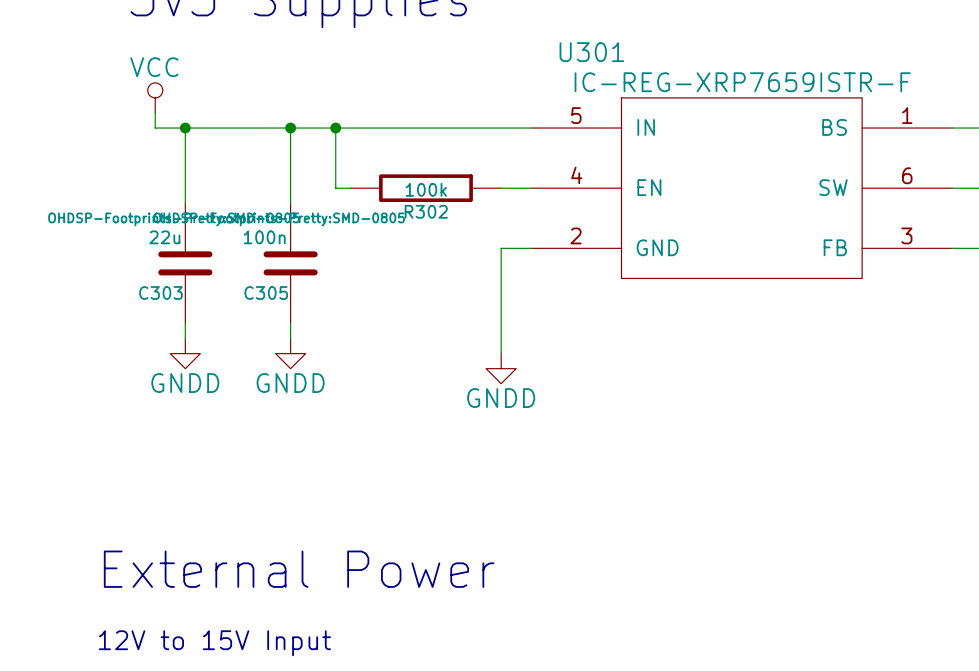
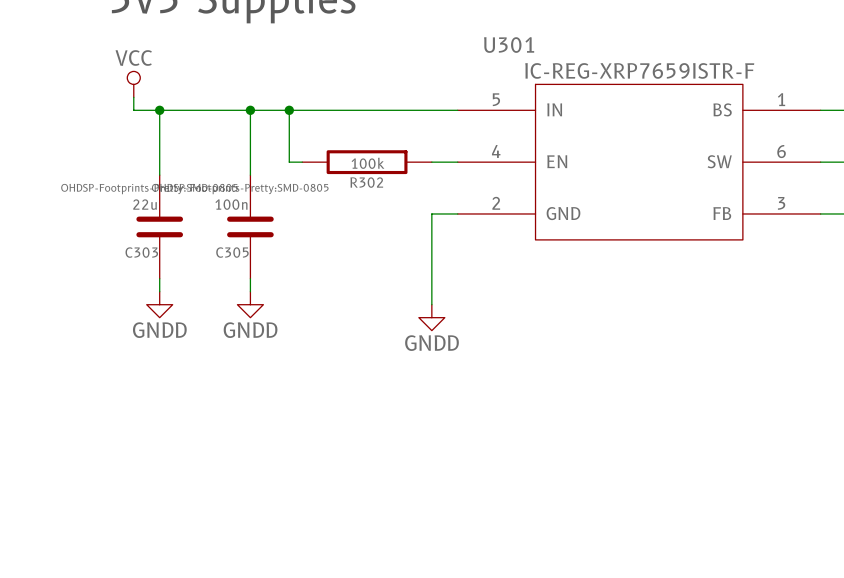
text: External Power (299, 569) -> none
text: 12V to 15V Input (214, 643) -> none

